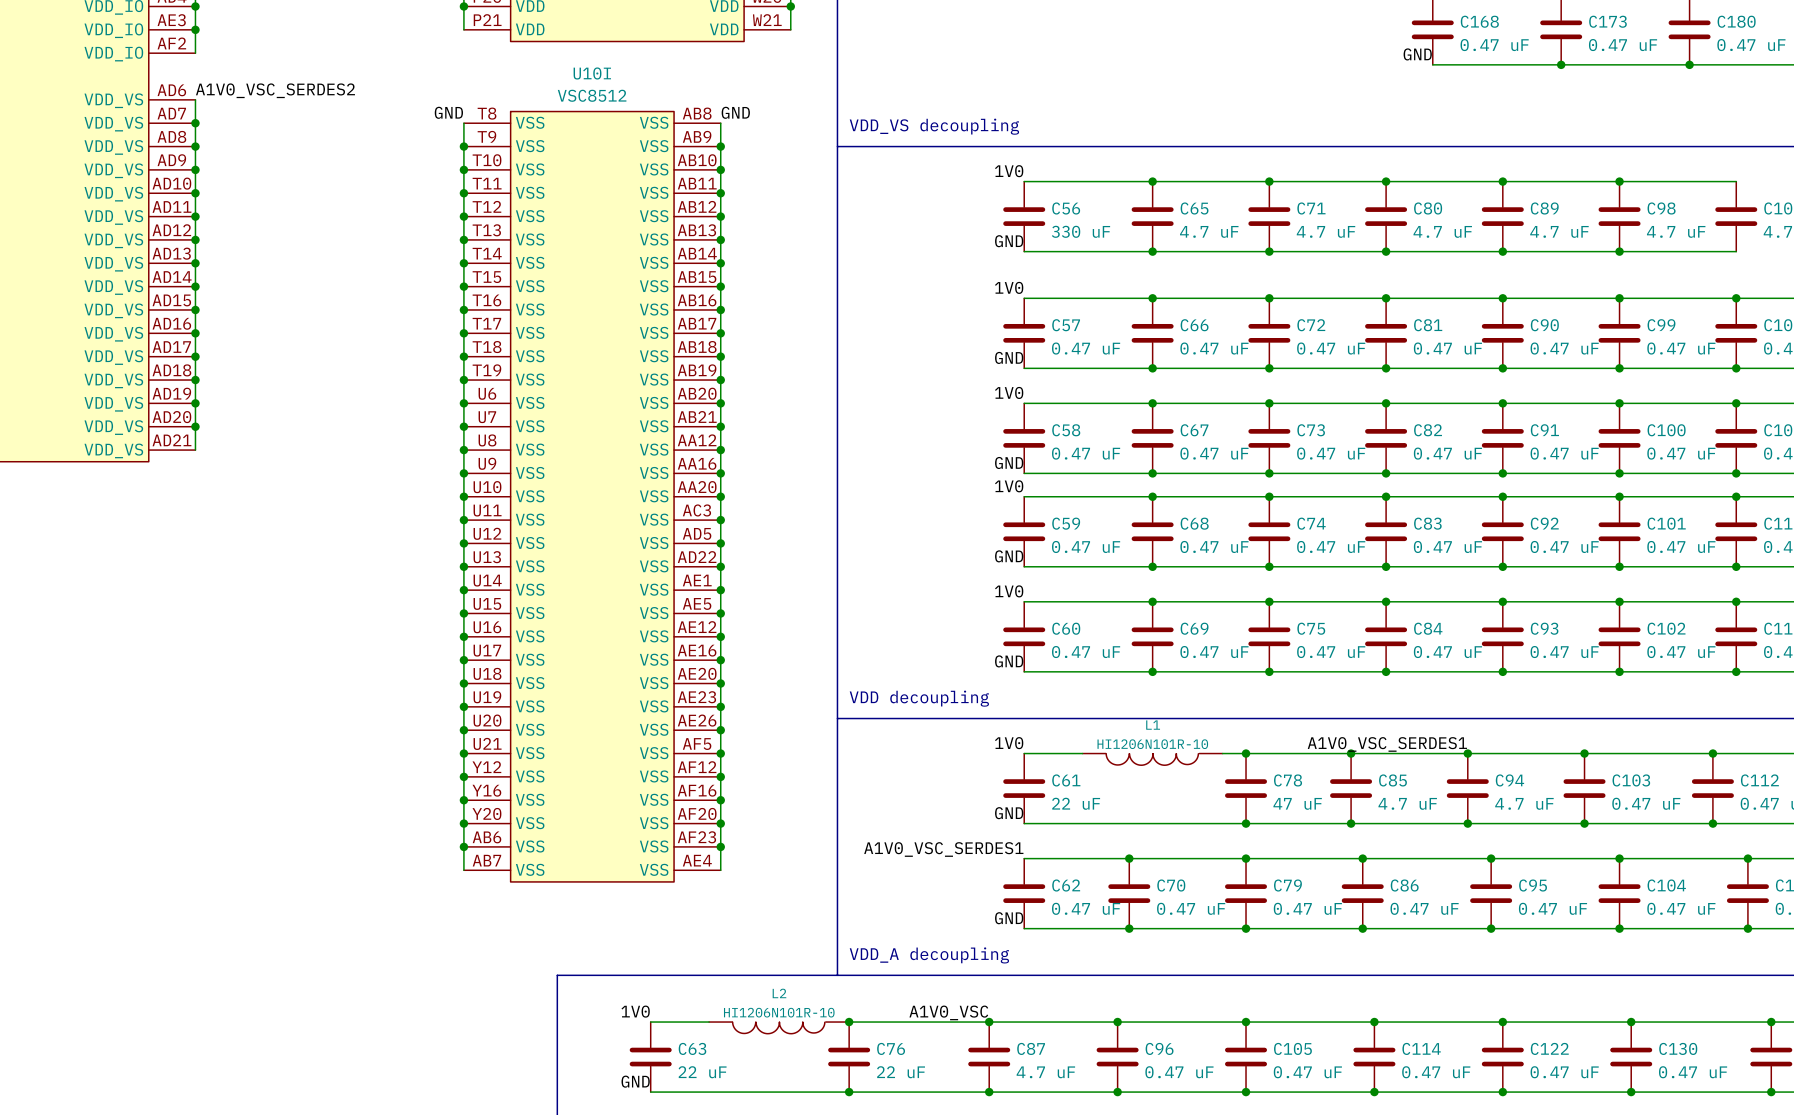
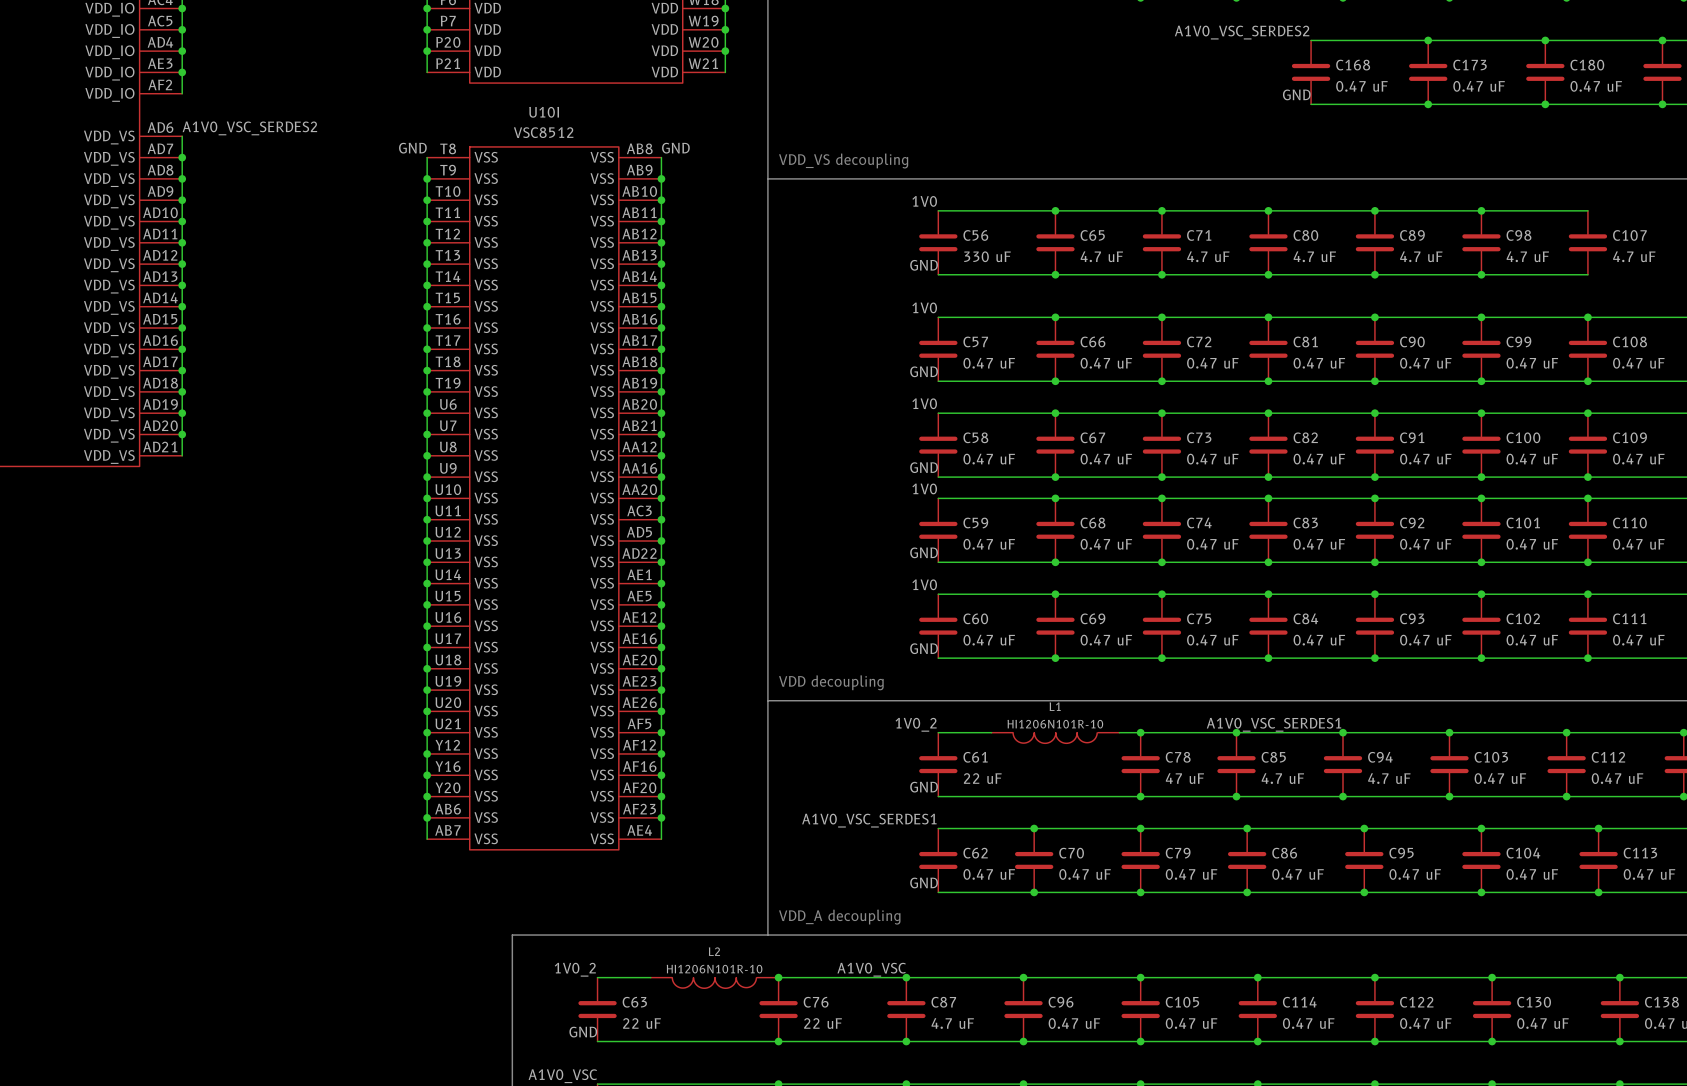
label: 1V0 (1009, 743) -> 1V0_2 (916, 724)
label: 1V0 (635, 1011) -> 1V0_2 (575, 969)

